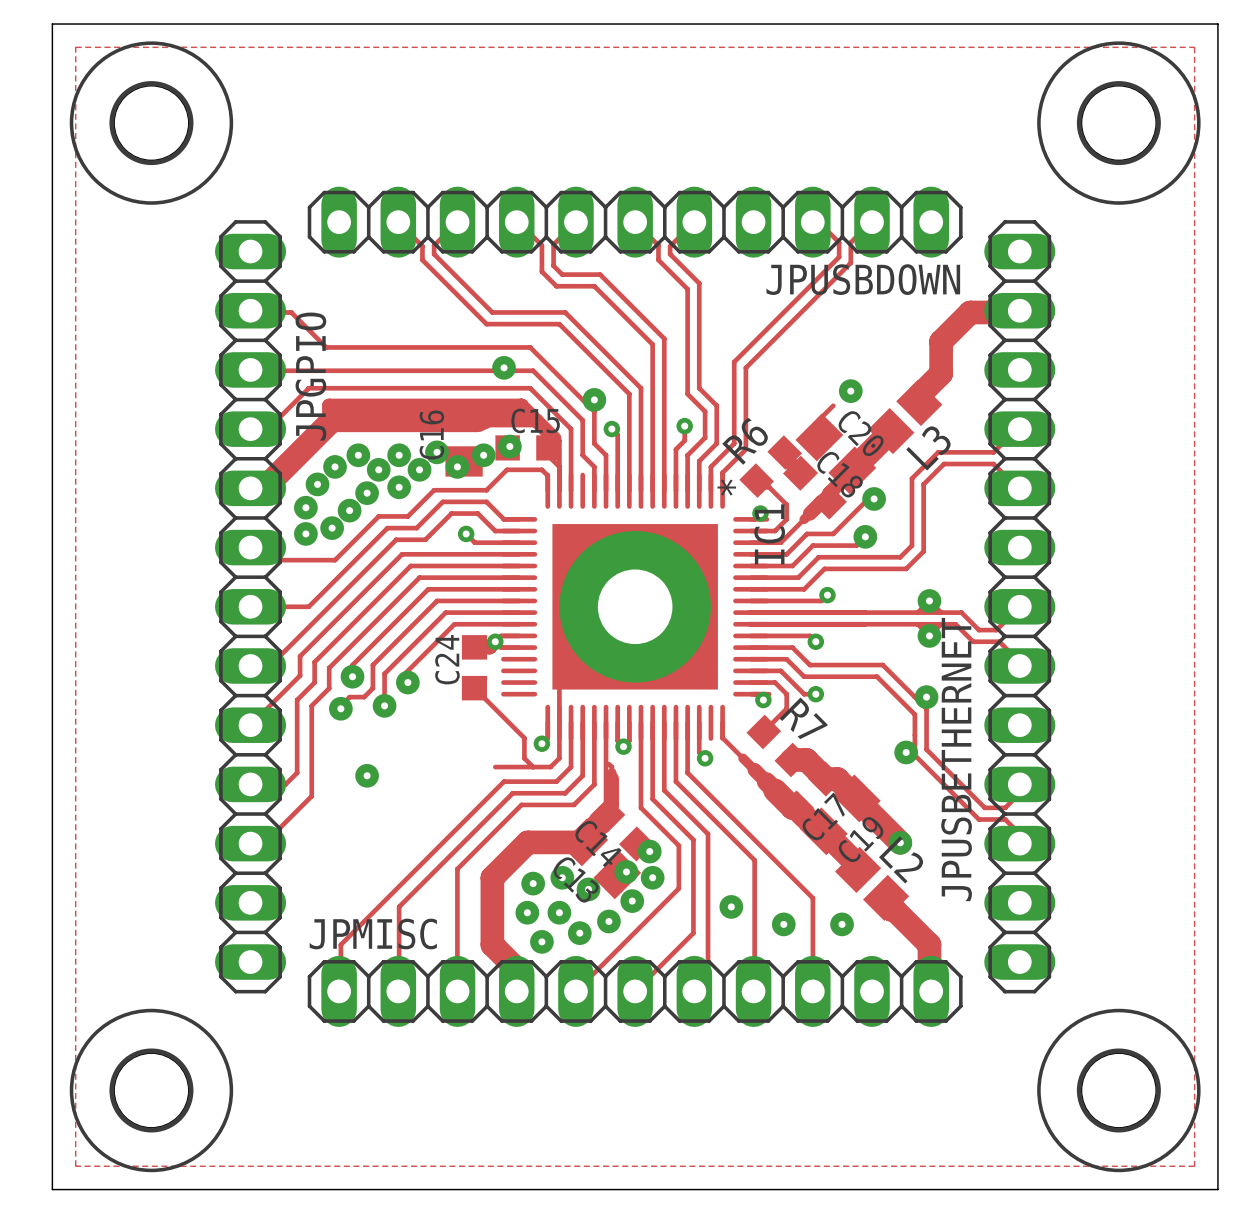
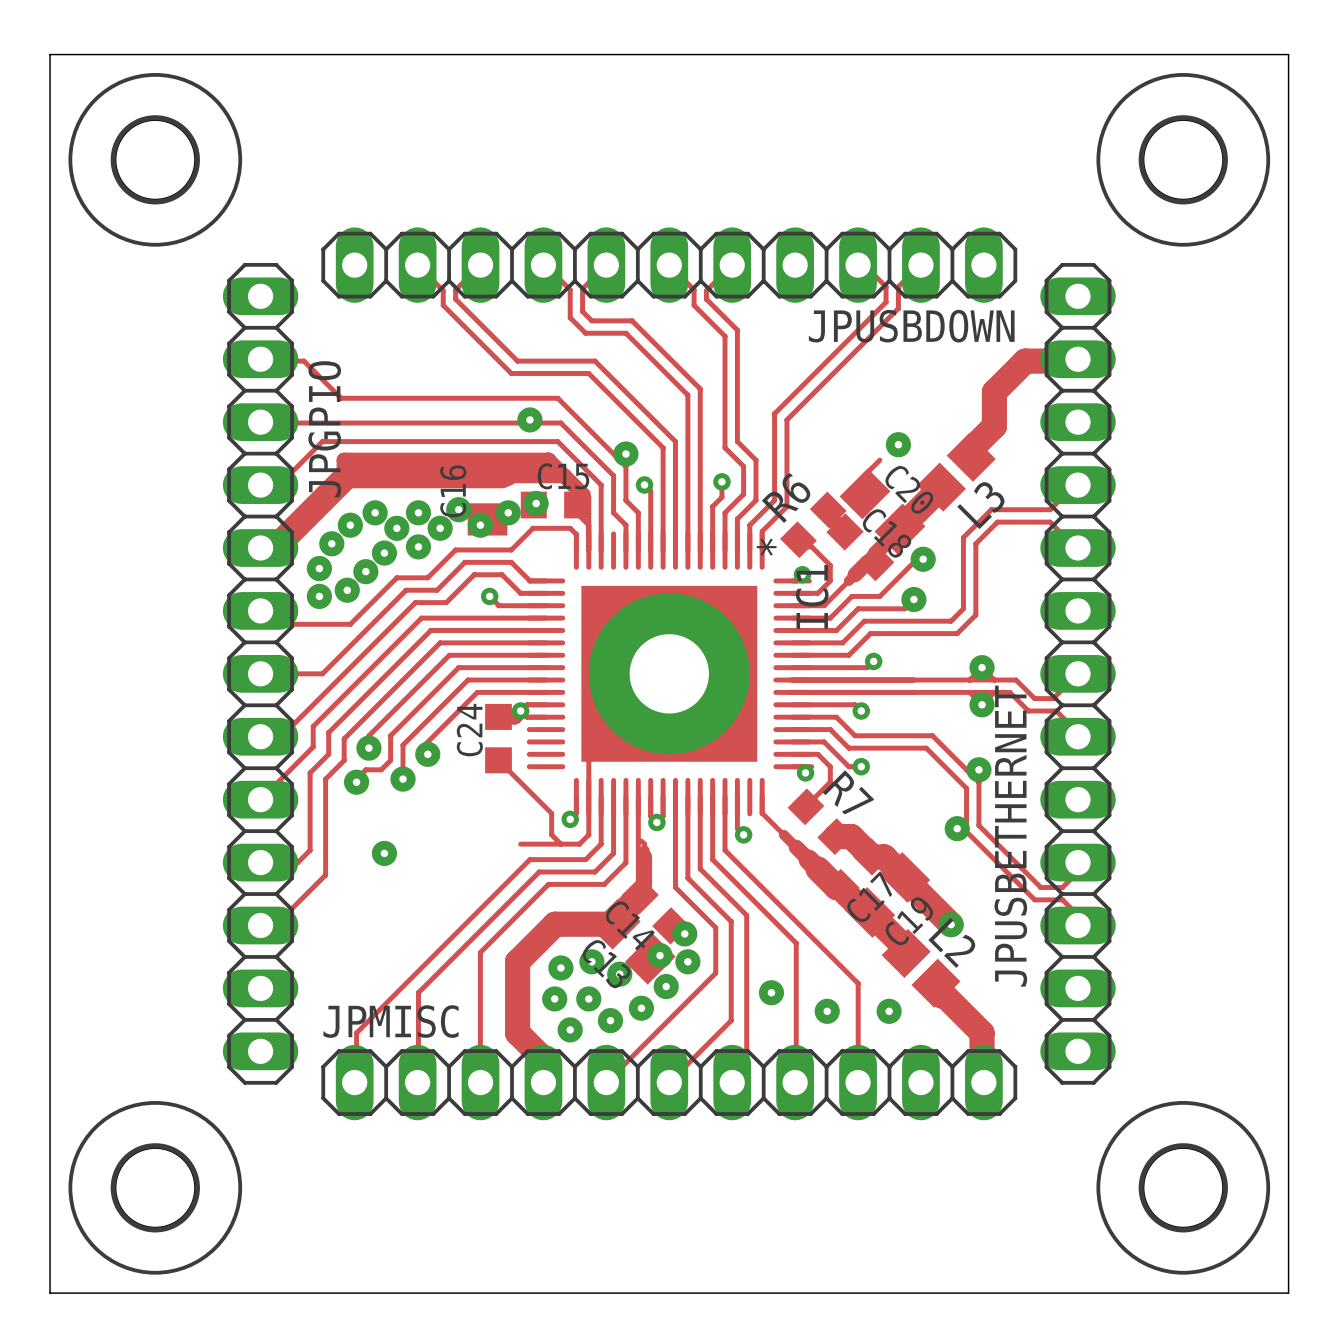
zone outline: (75, 47) (1194, 47) (1194, 1166) (75, 1166) (75, 47) -> none

